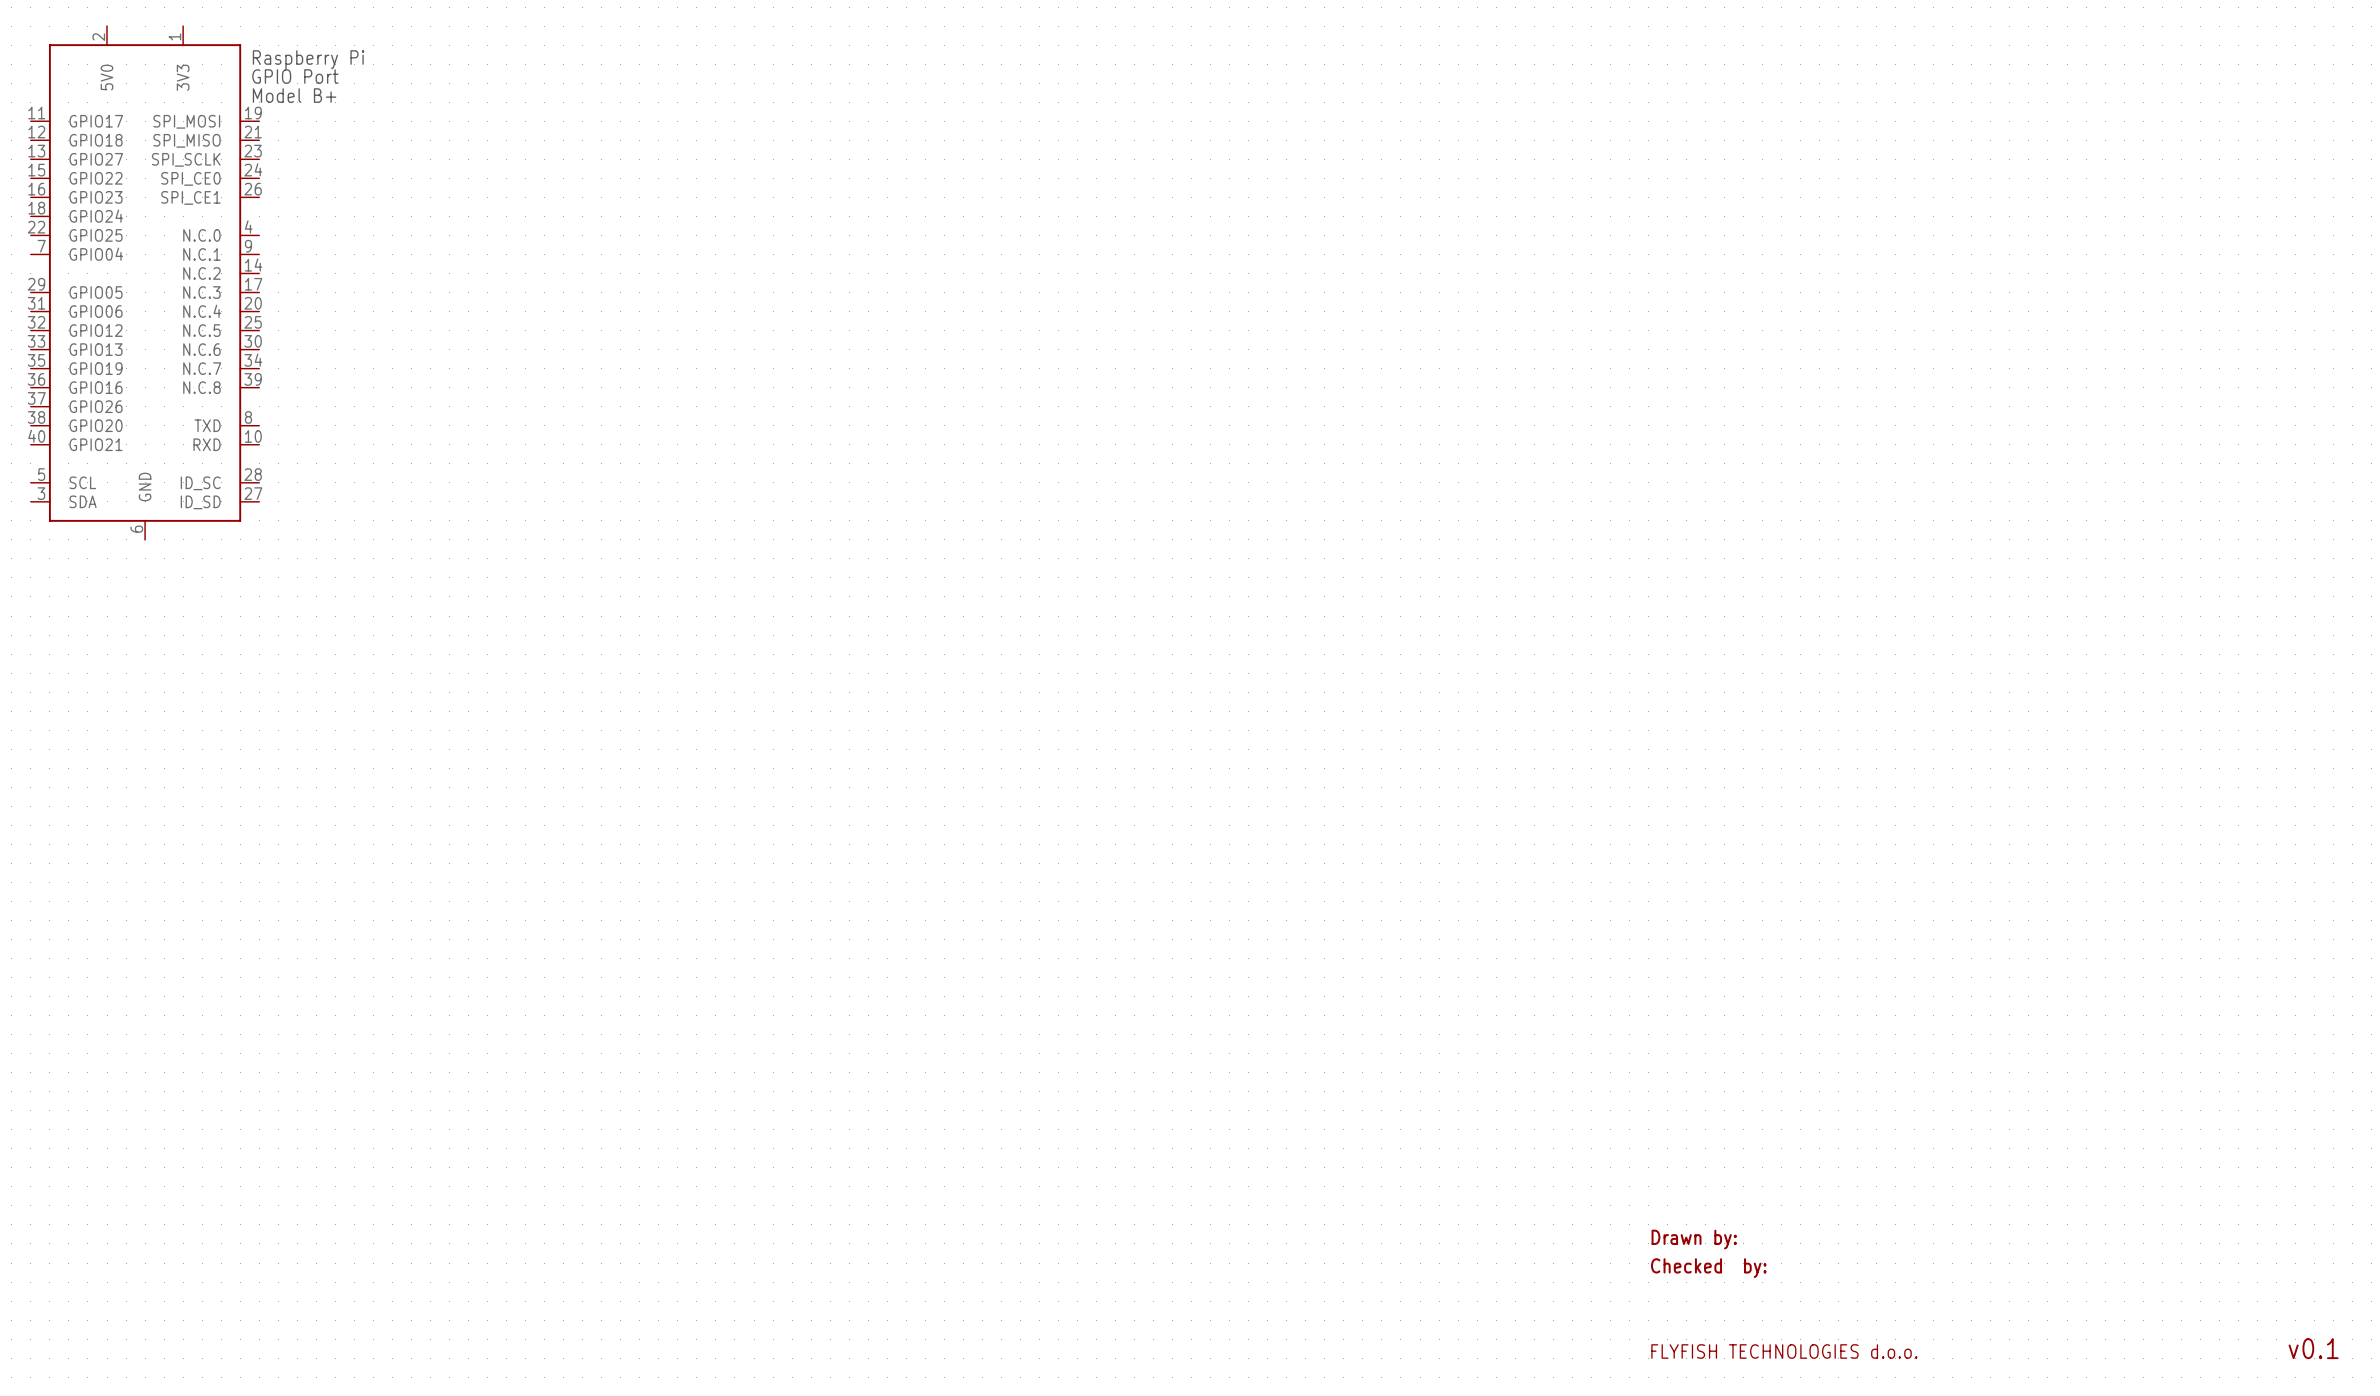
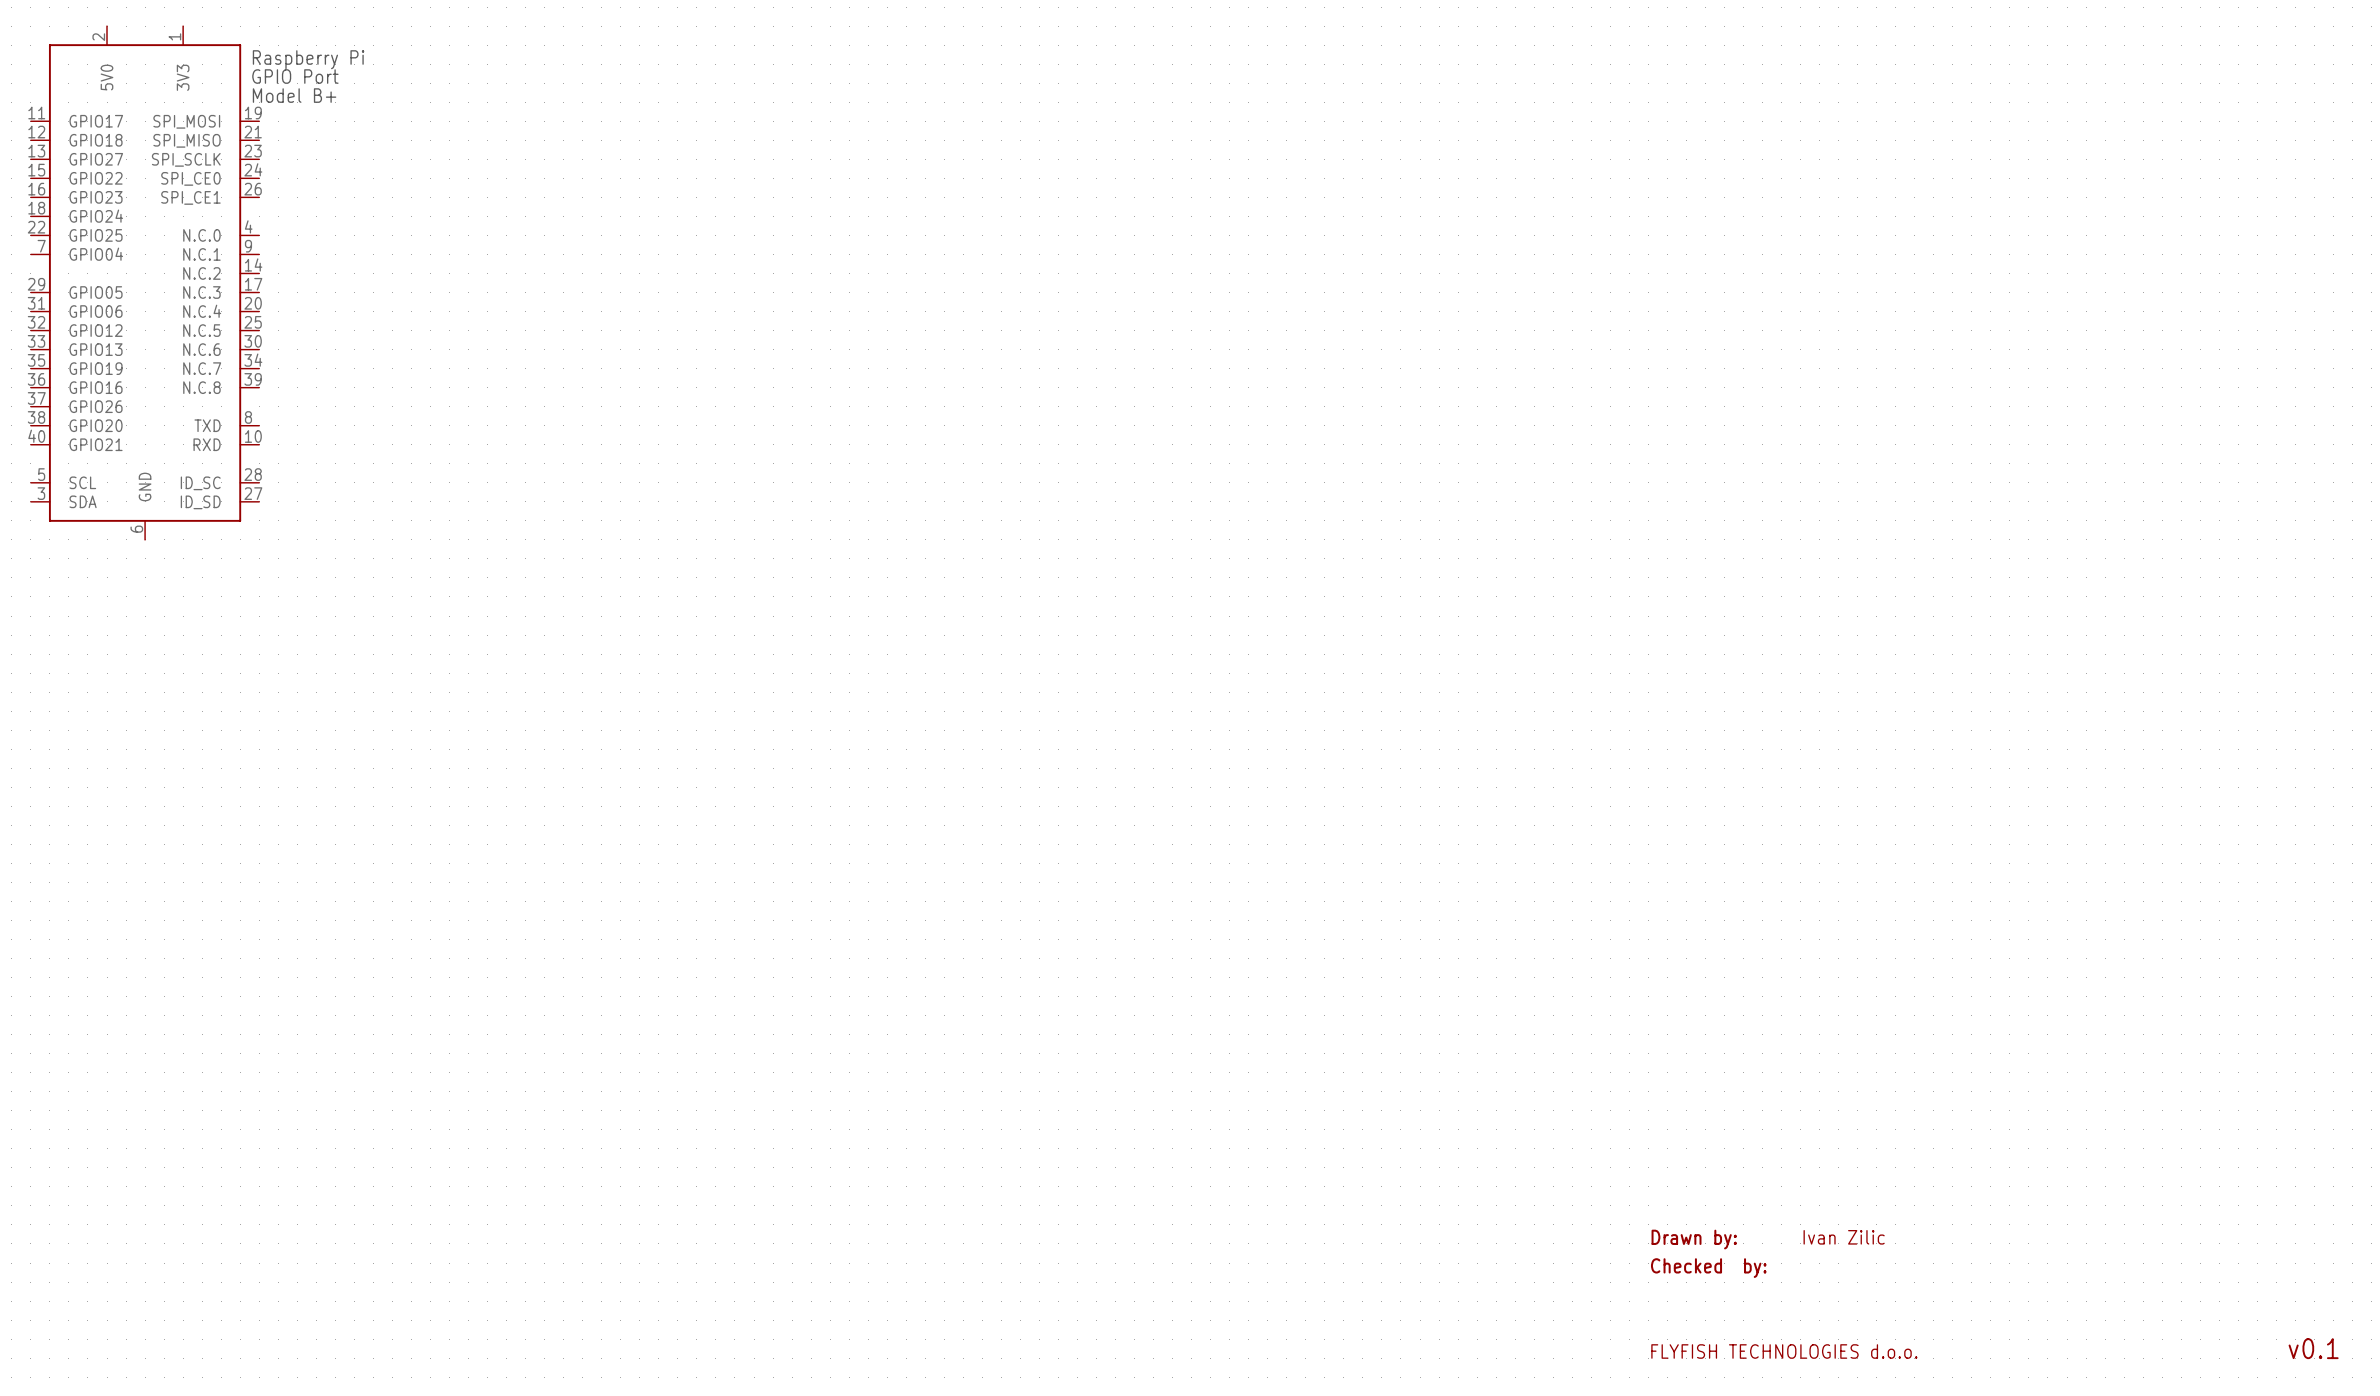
text: none -> Ivan Zilic (1844, 1237)

